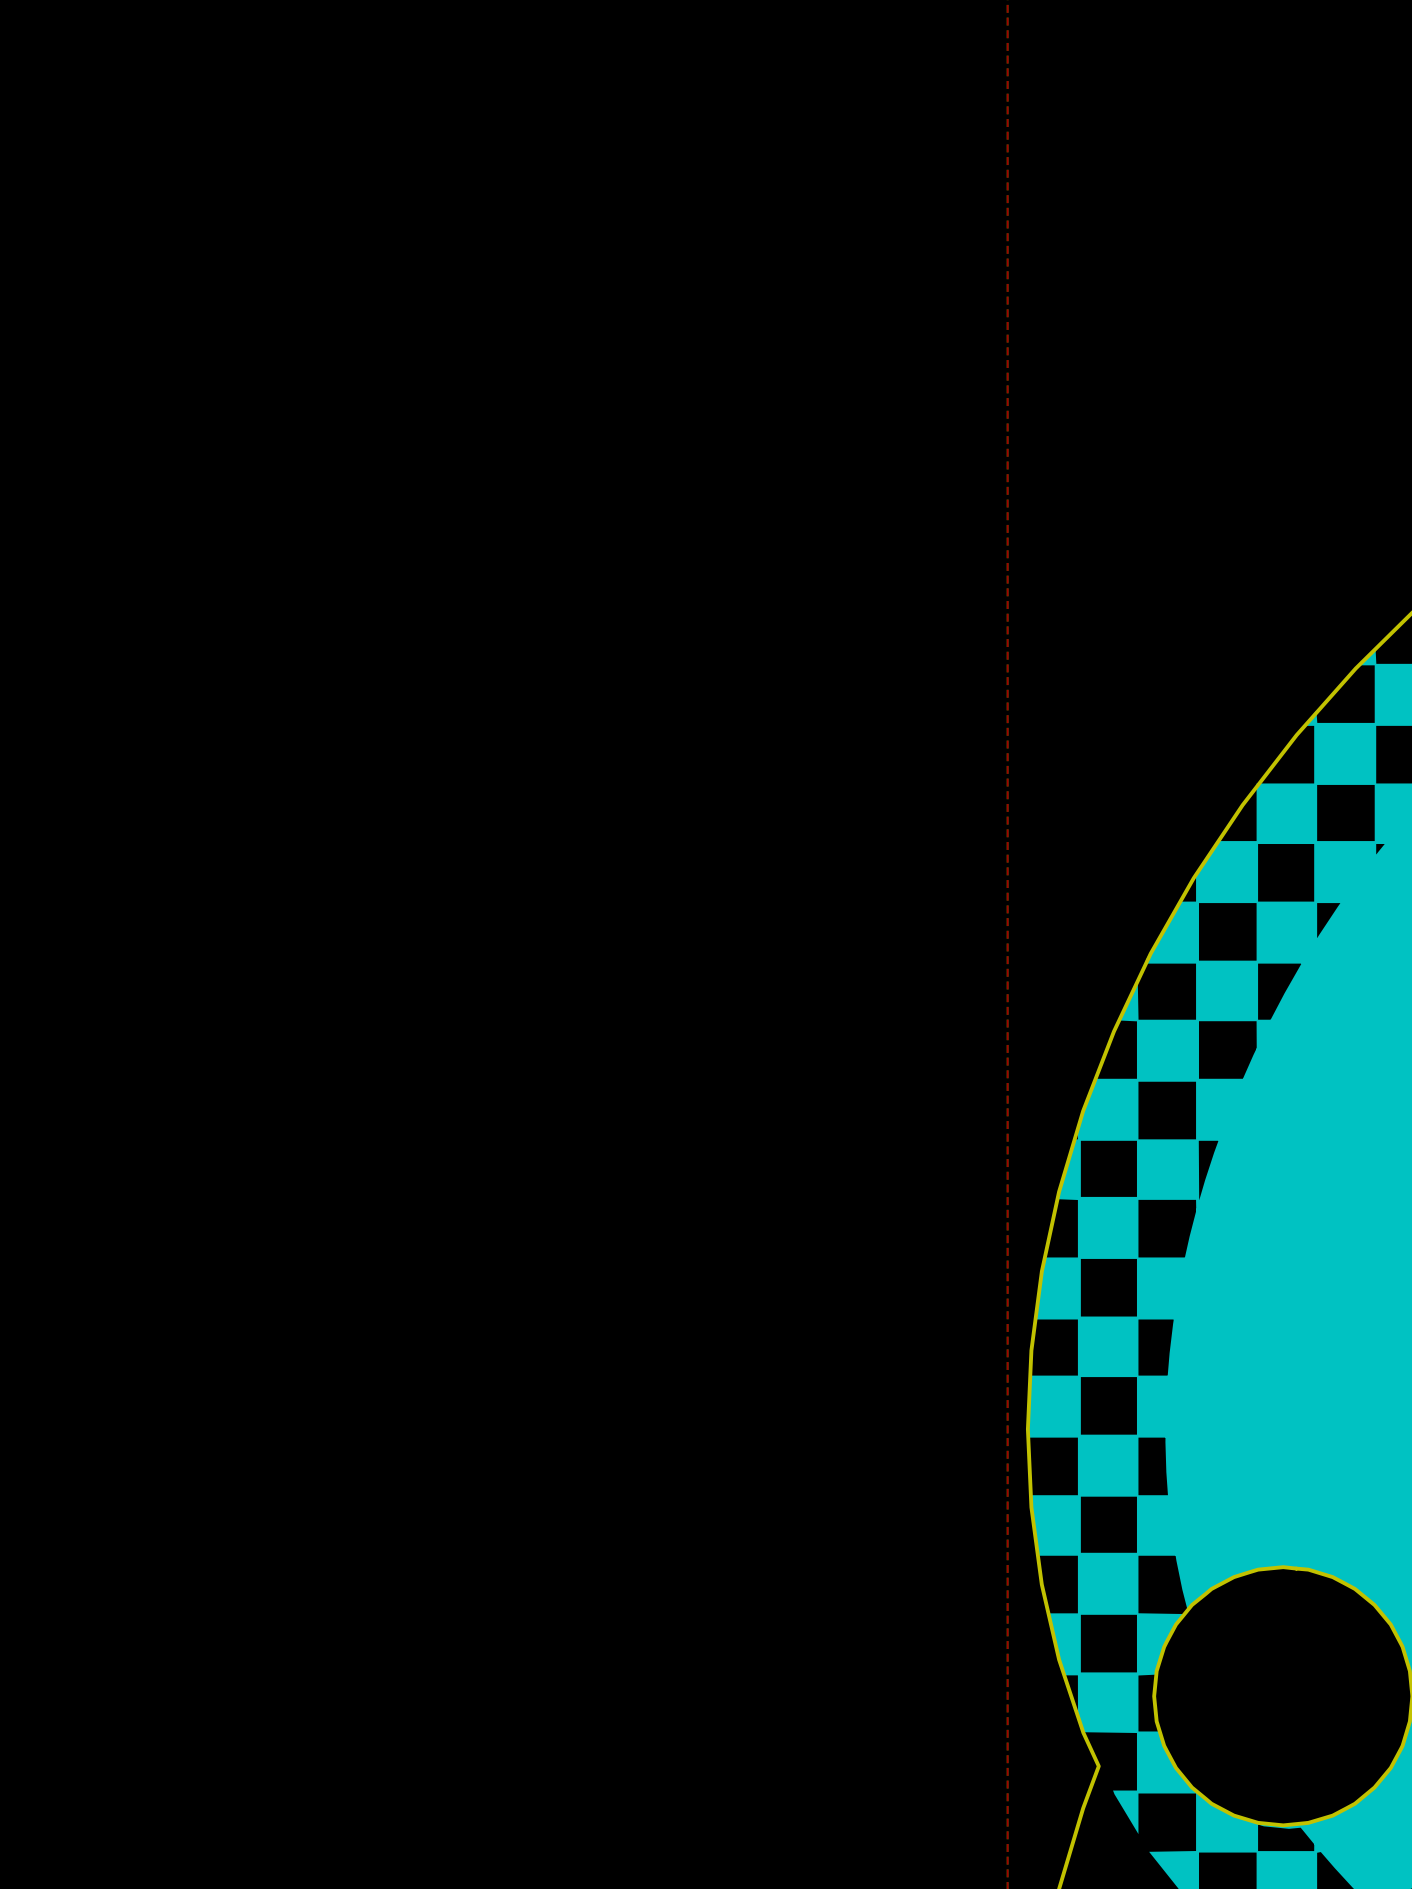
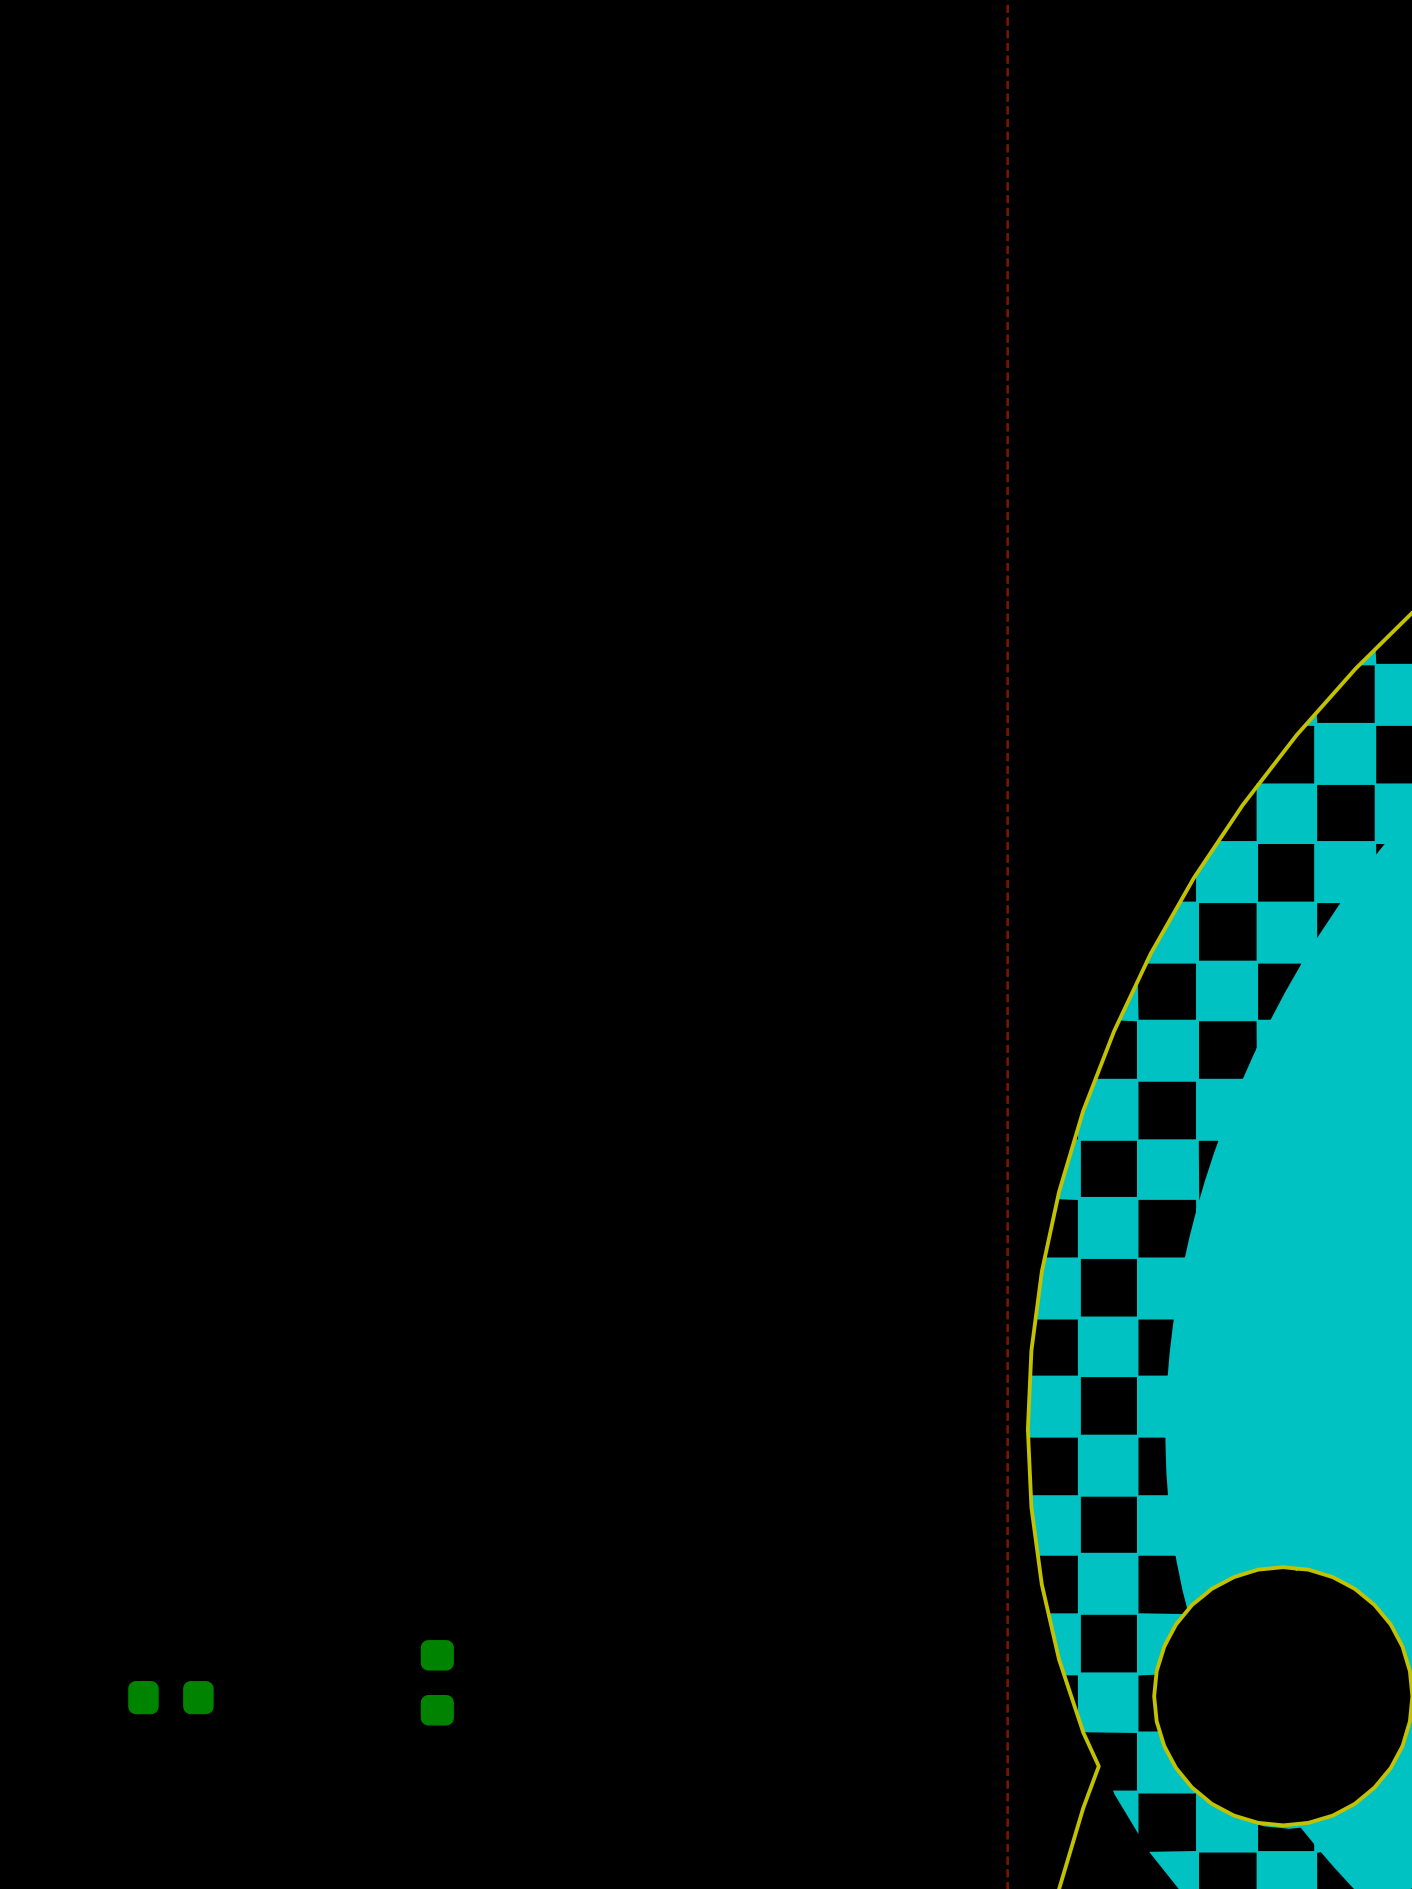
part: none -> (437, 1682)
part: none -> (170, 1697)

